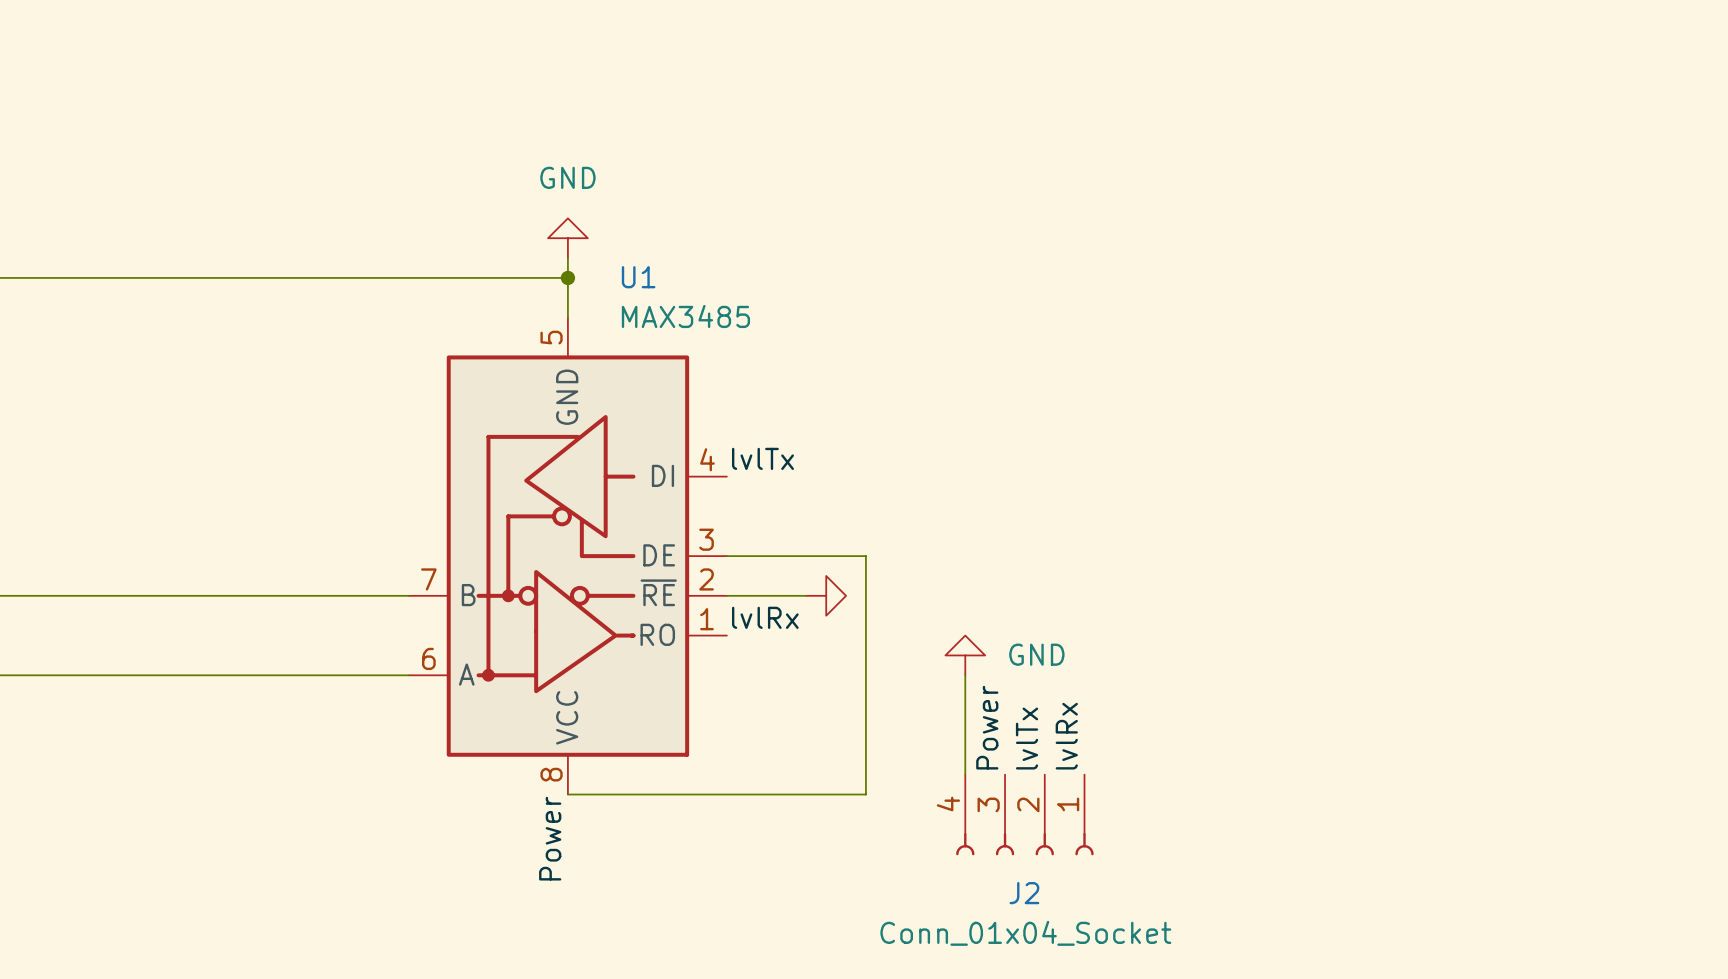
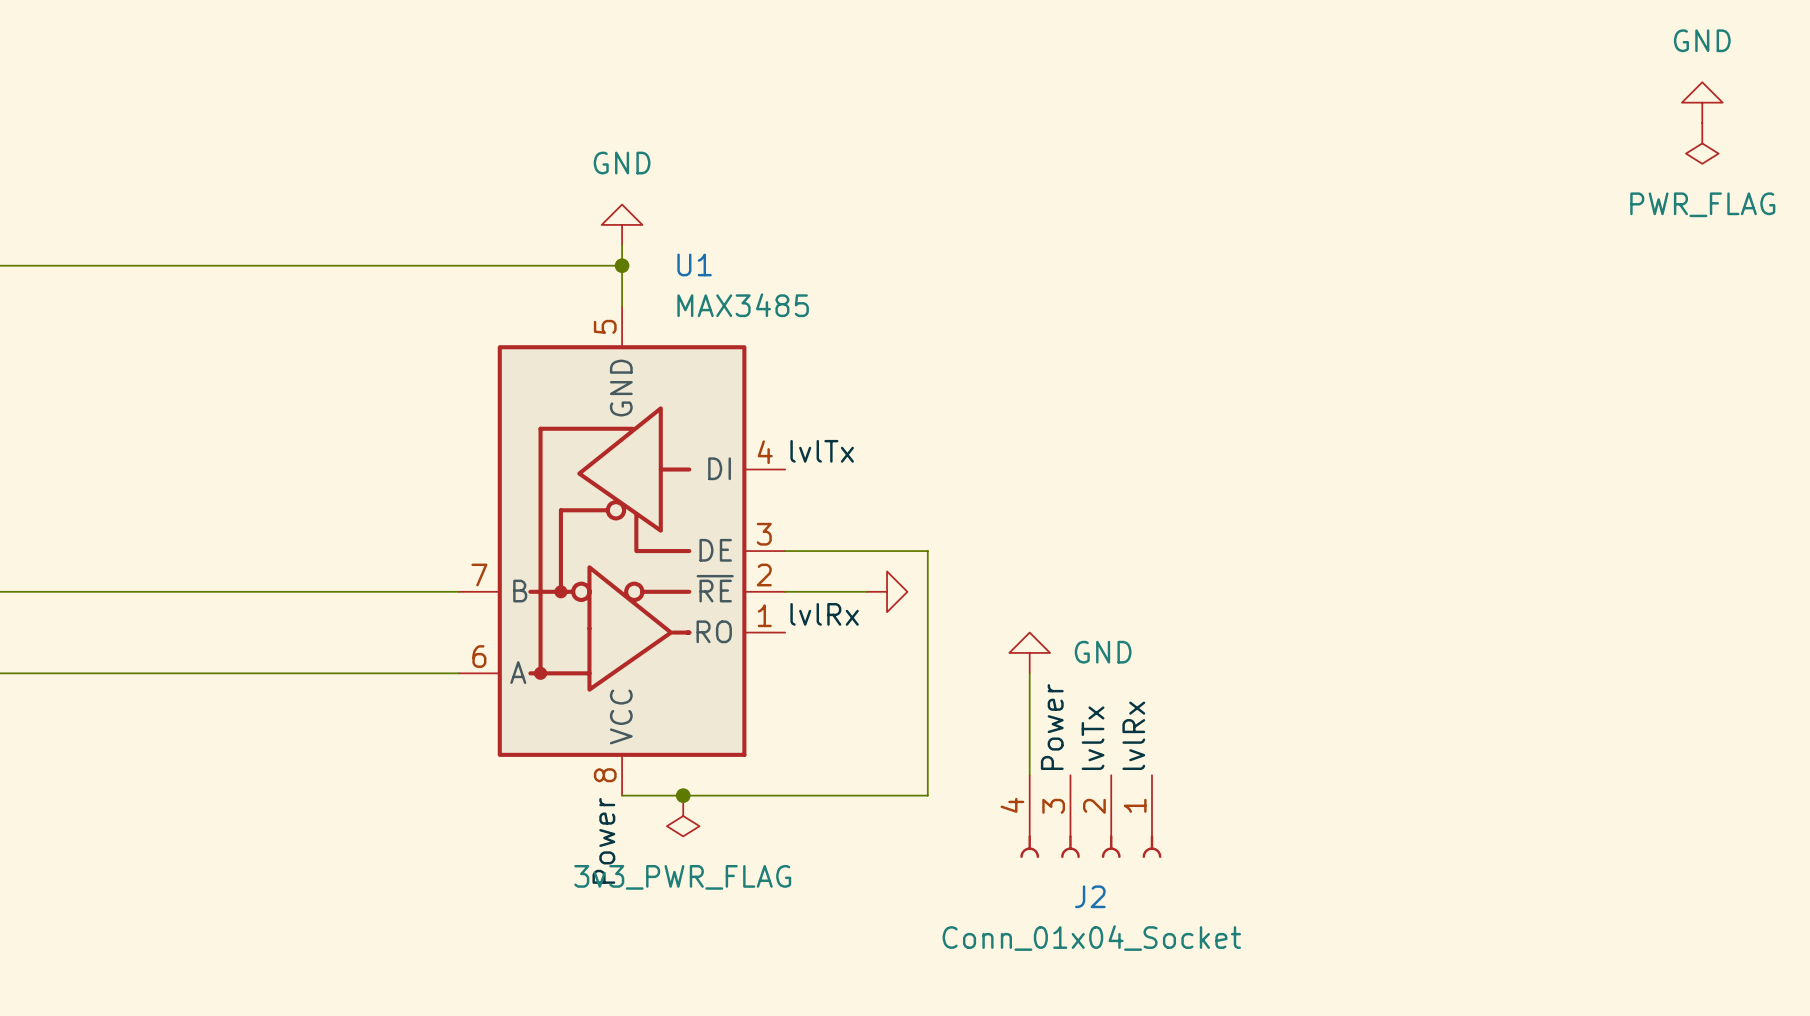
power symbol: none -> GND (1702, 102)
power symbol: none -> PWR_FLAG (1702, 143)
junction: none -> (683, 795)
power symbol: none -> 3v3_PWR_FLAG (683, 816)

